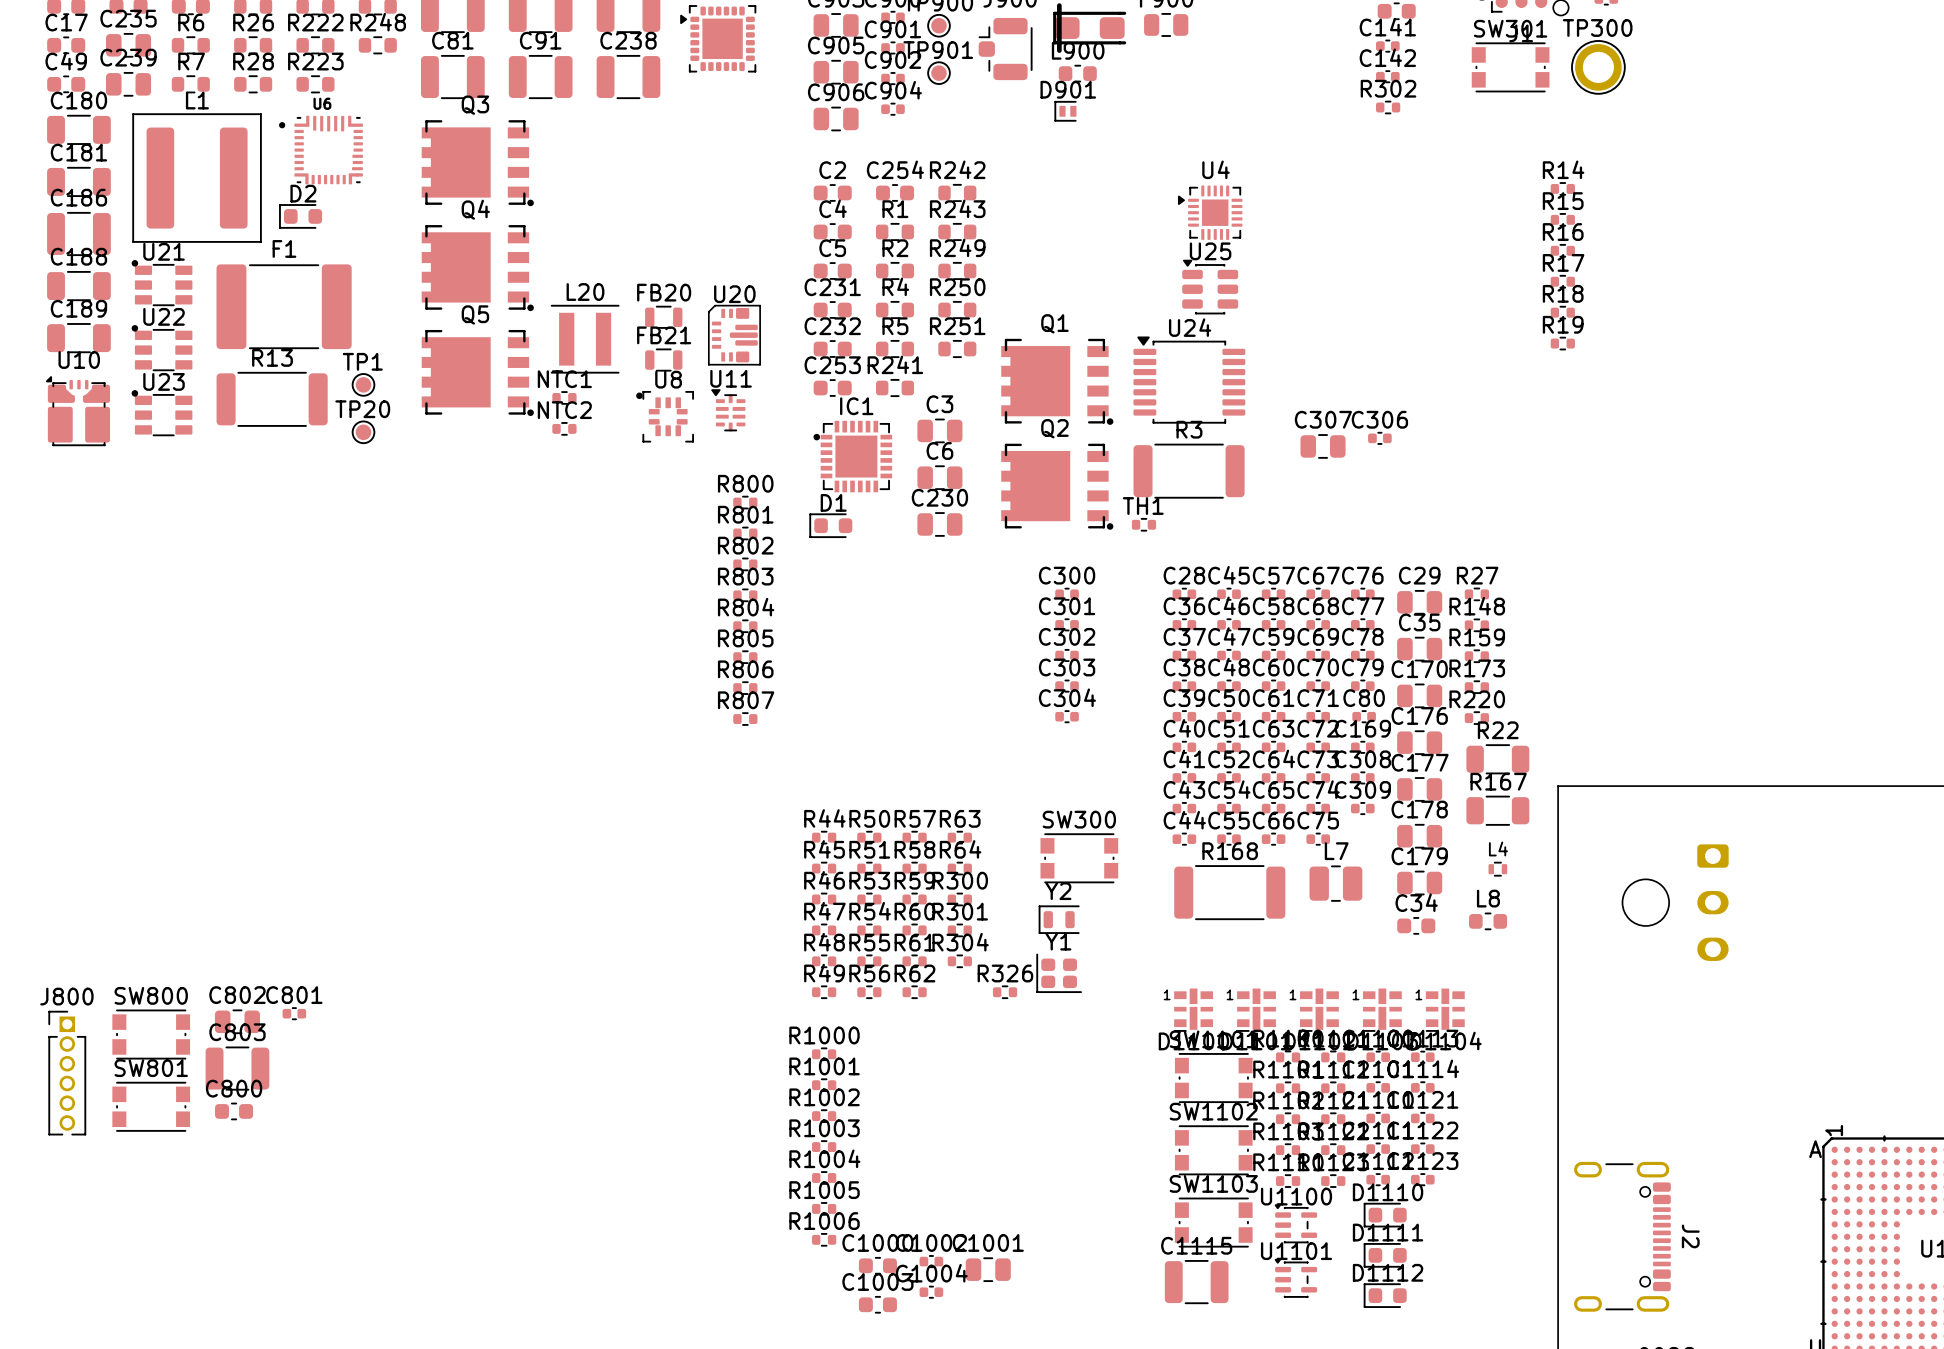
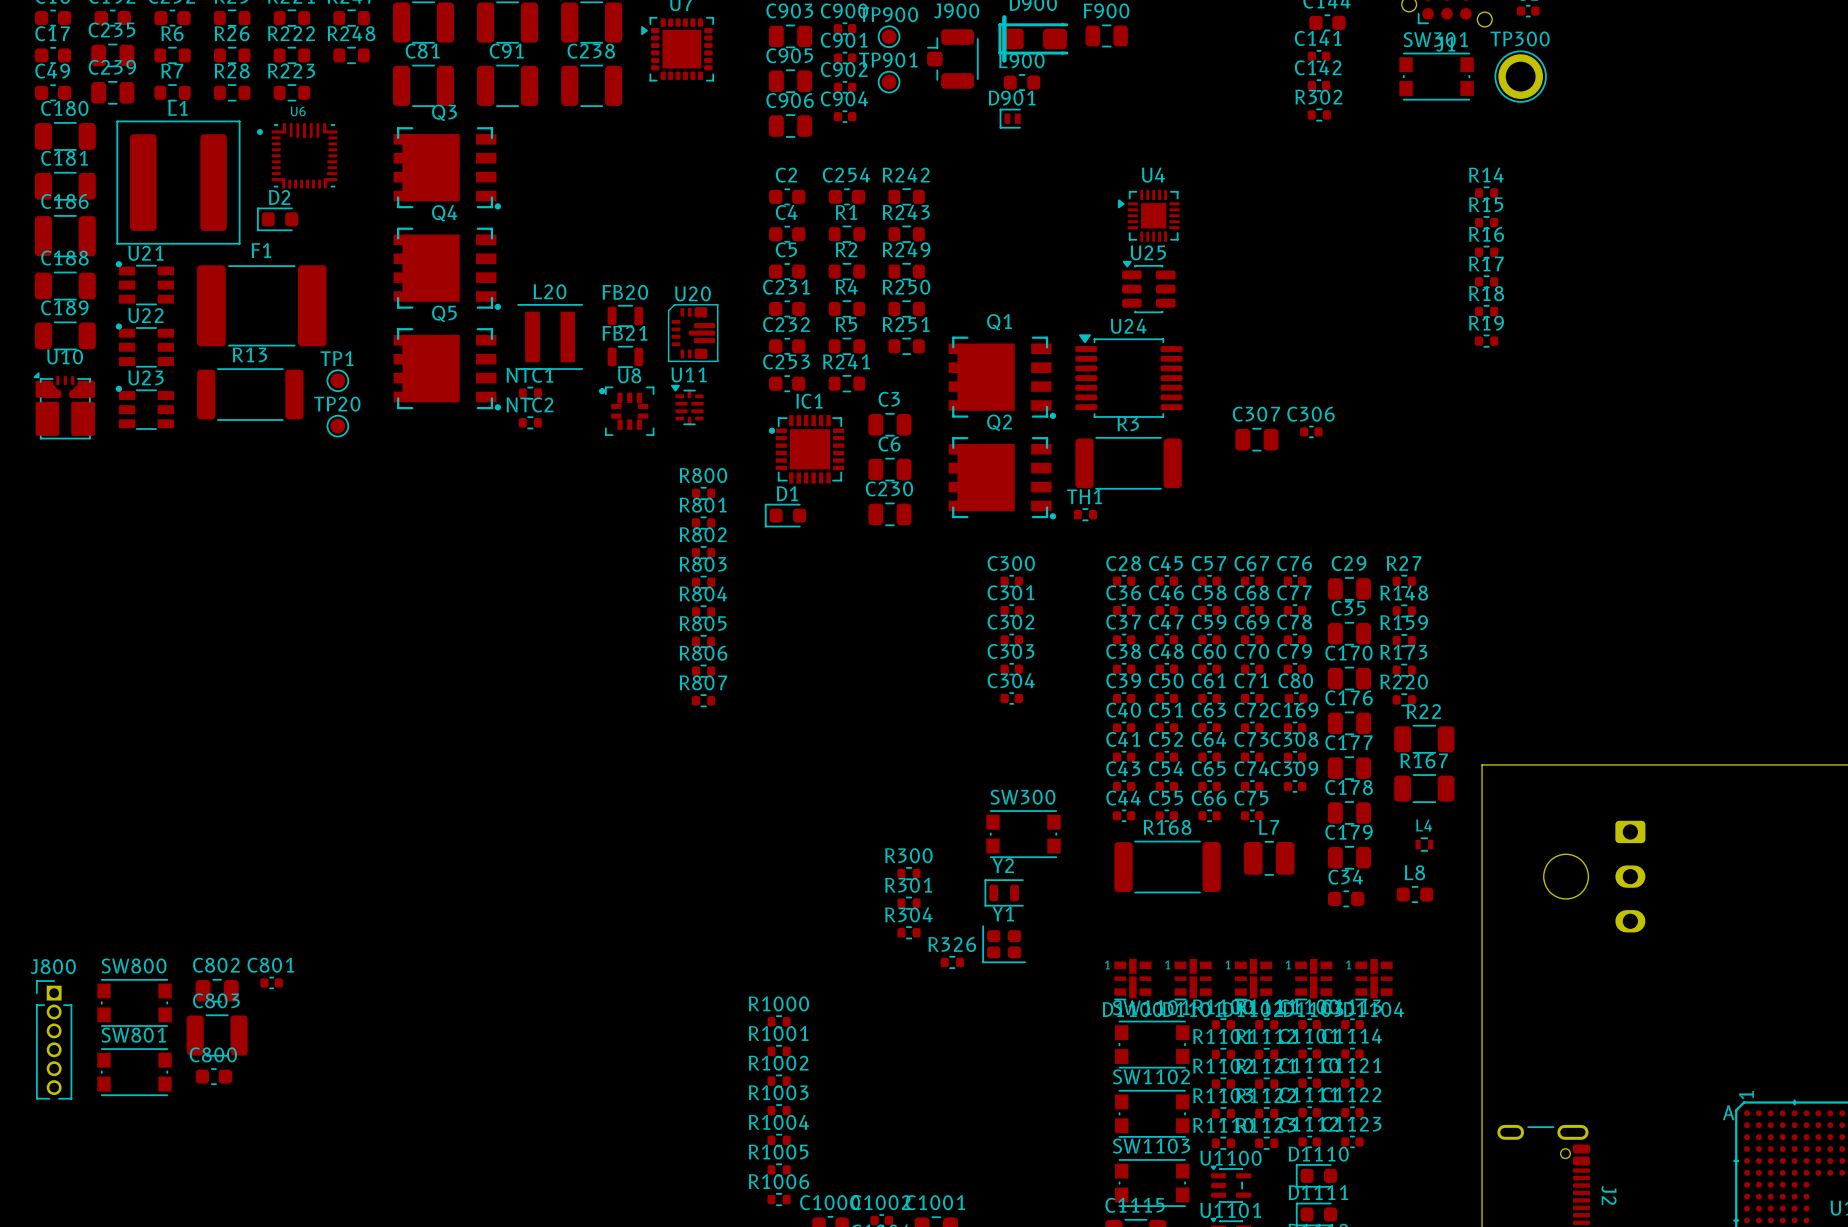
R44: (824, 837) -> none
R50: (869, 837) -> none
R57: (914, 837) -> none
R63: (959, 837) -> none
R45: (824, 868) -> none
R51: (869, 868) -> none
R58: (914, 868) -> none
R64: (959, 868) -> none
R46: (824, 899) -> none
R53: (869, 899) -> none
R59: (914, 899) -> none
R47: (824, 930) -> none
R54: (869, 930) -> none
R60: (914, 930) -> none
R48: (824, 961) -> none
R55: (869, 961) -> none
R61: (914, 961) -> none
R49: (824, 992) -> none
R56: (869, 992) -> none
R62: (914, 992) -> none

